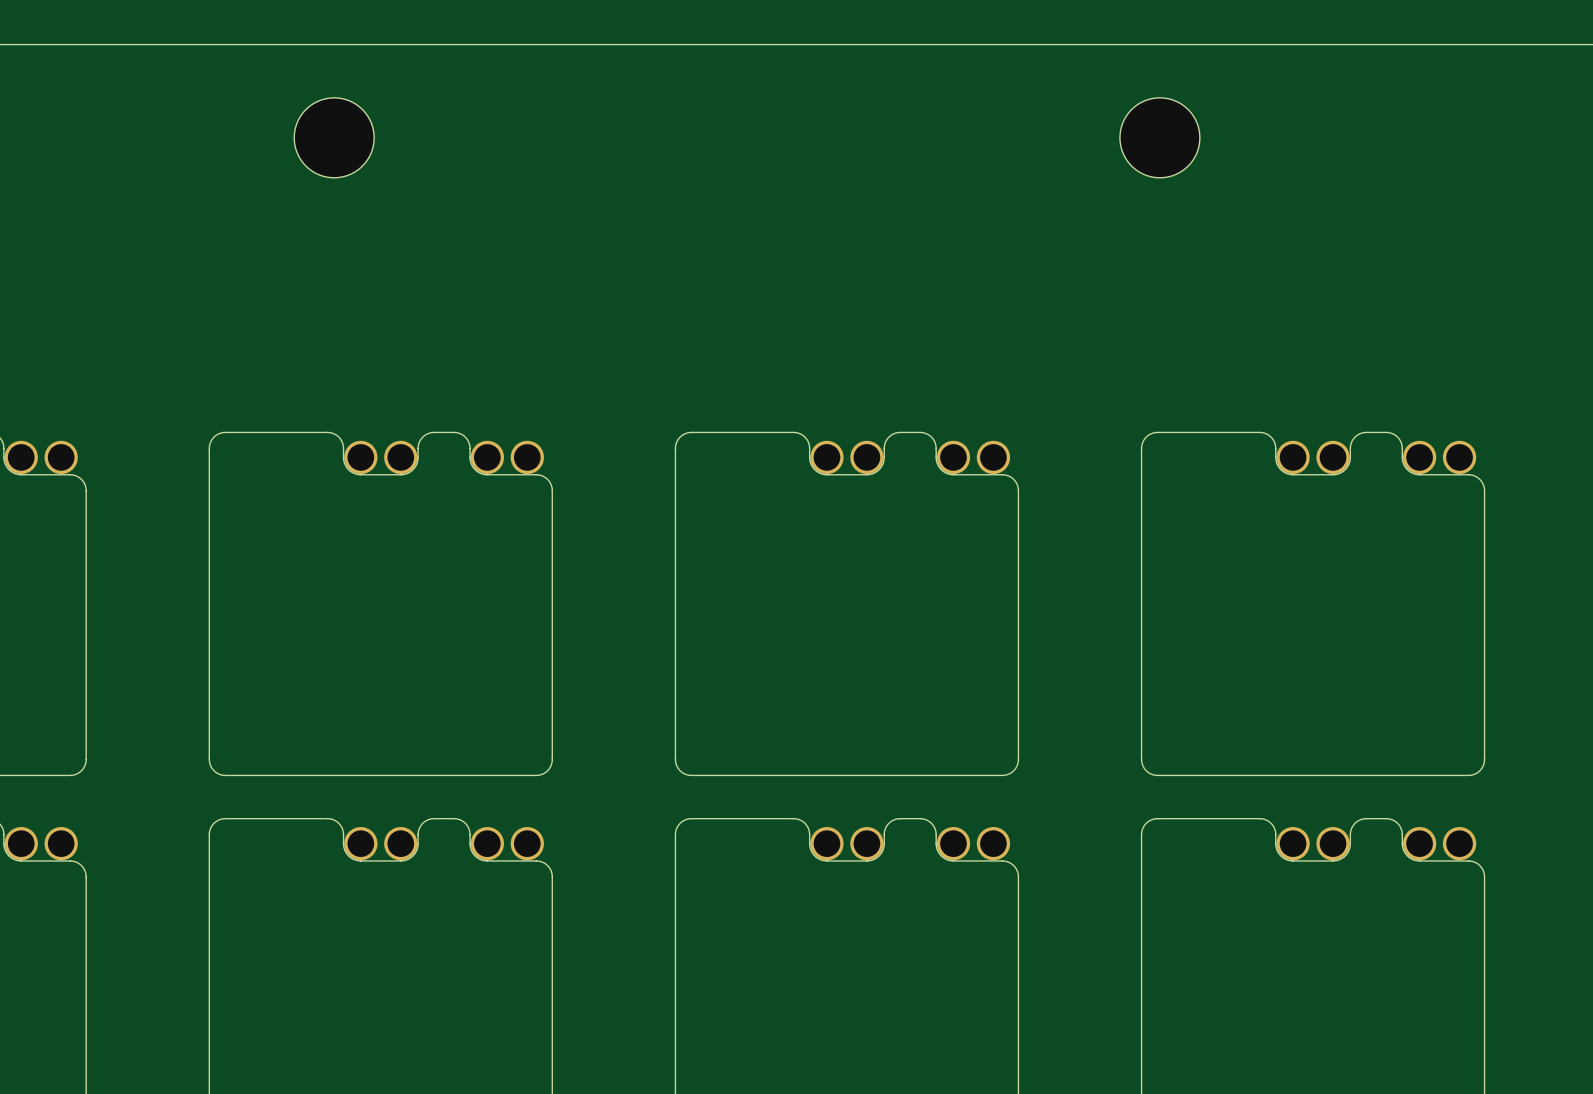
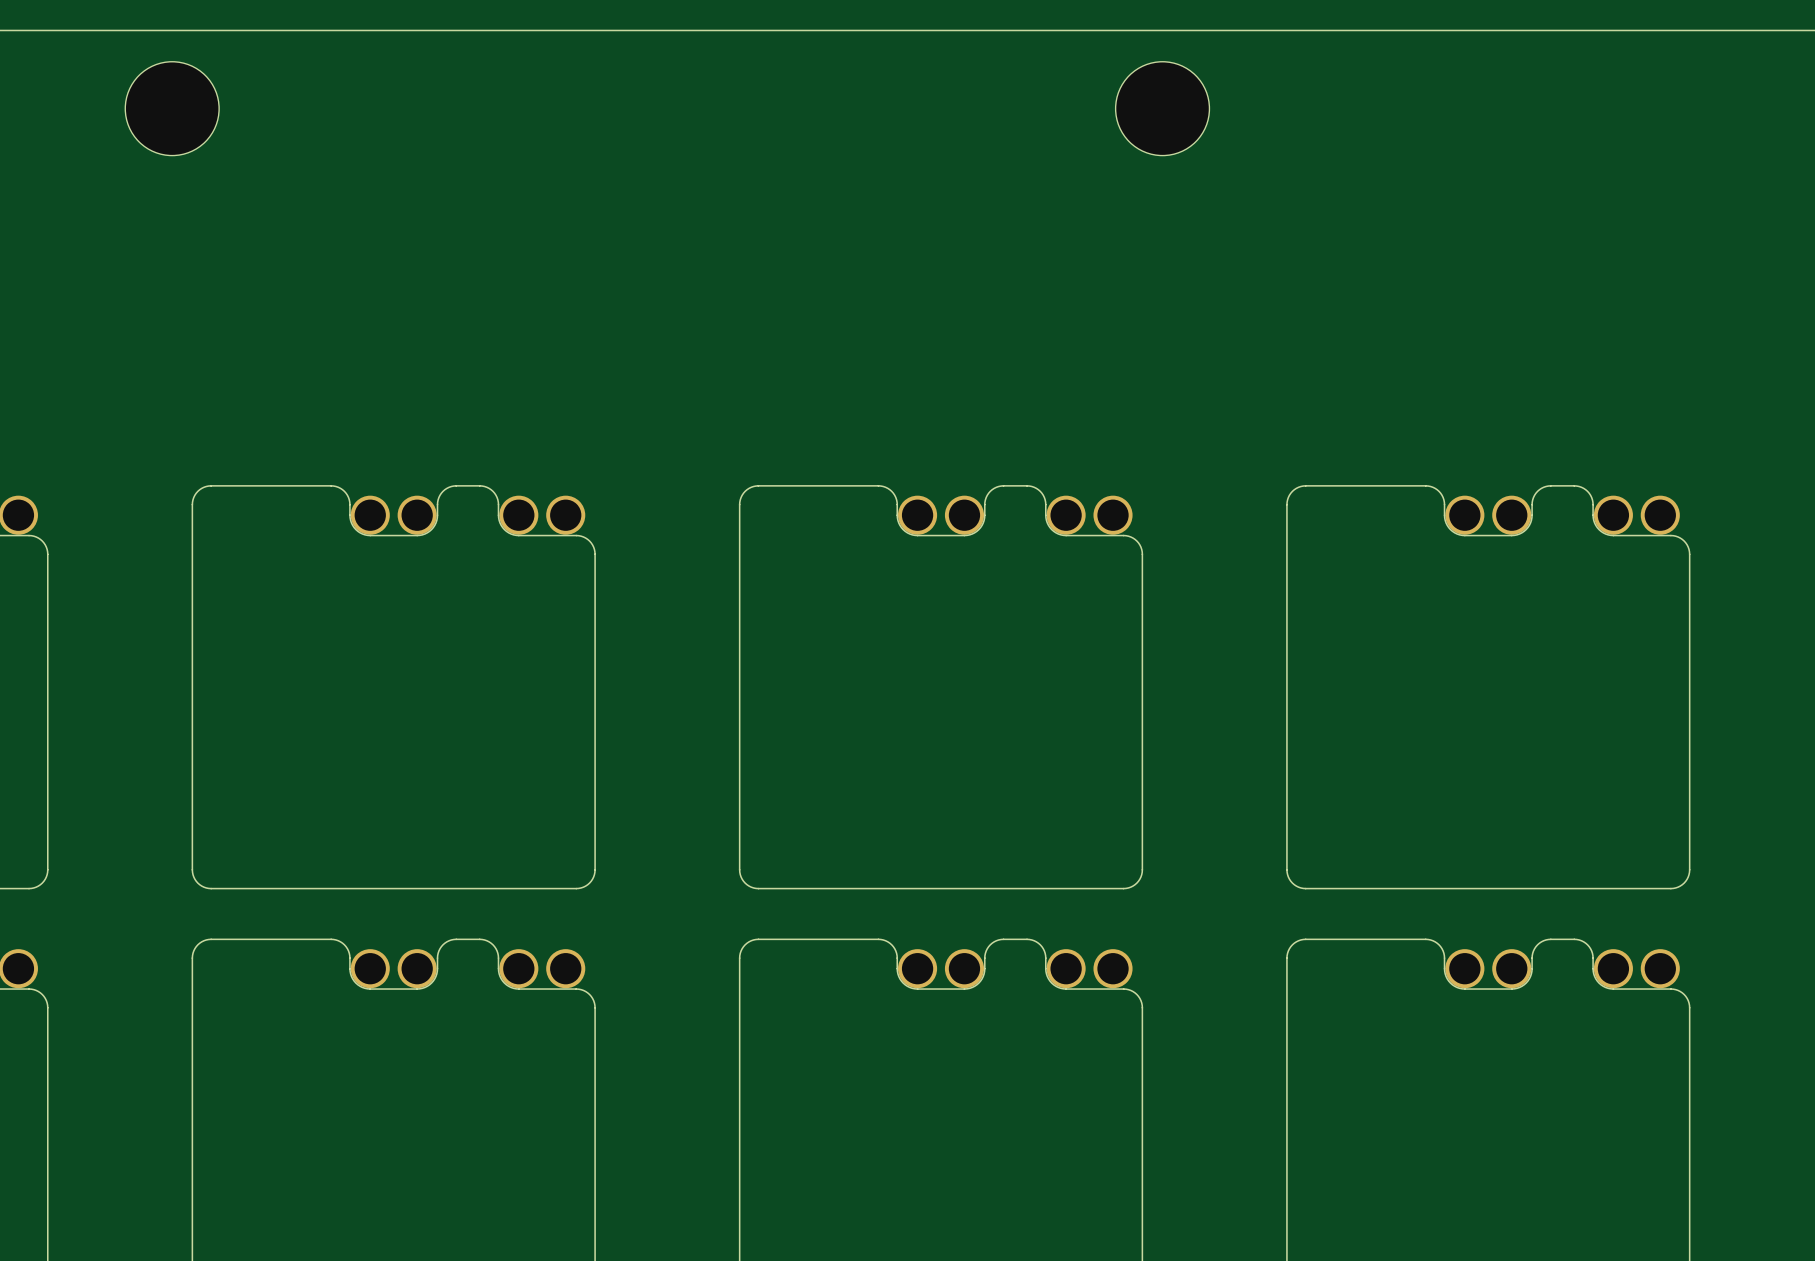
part position: (334, 137) -> (172, 108)
part position: (1159, 137) -> (1162, 108)

